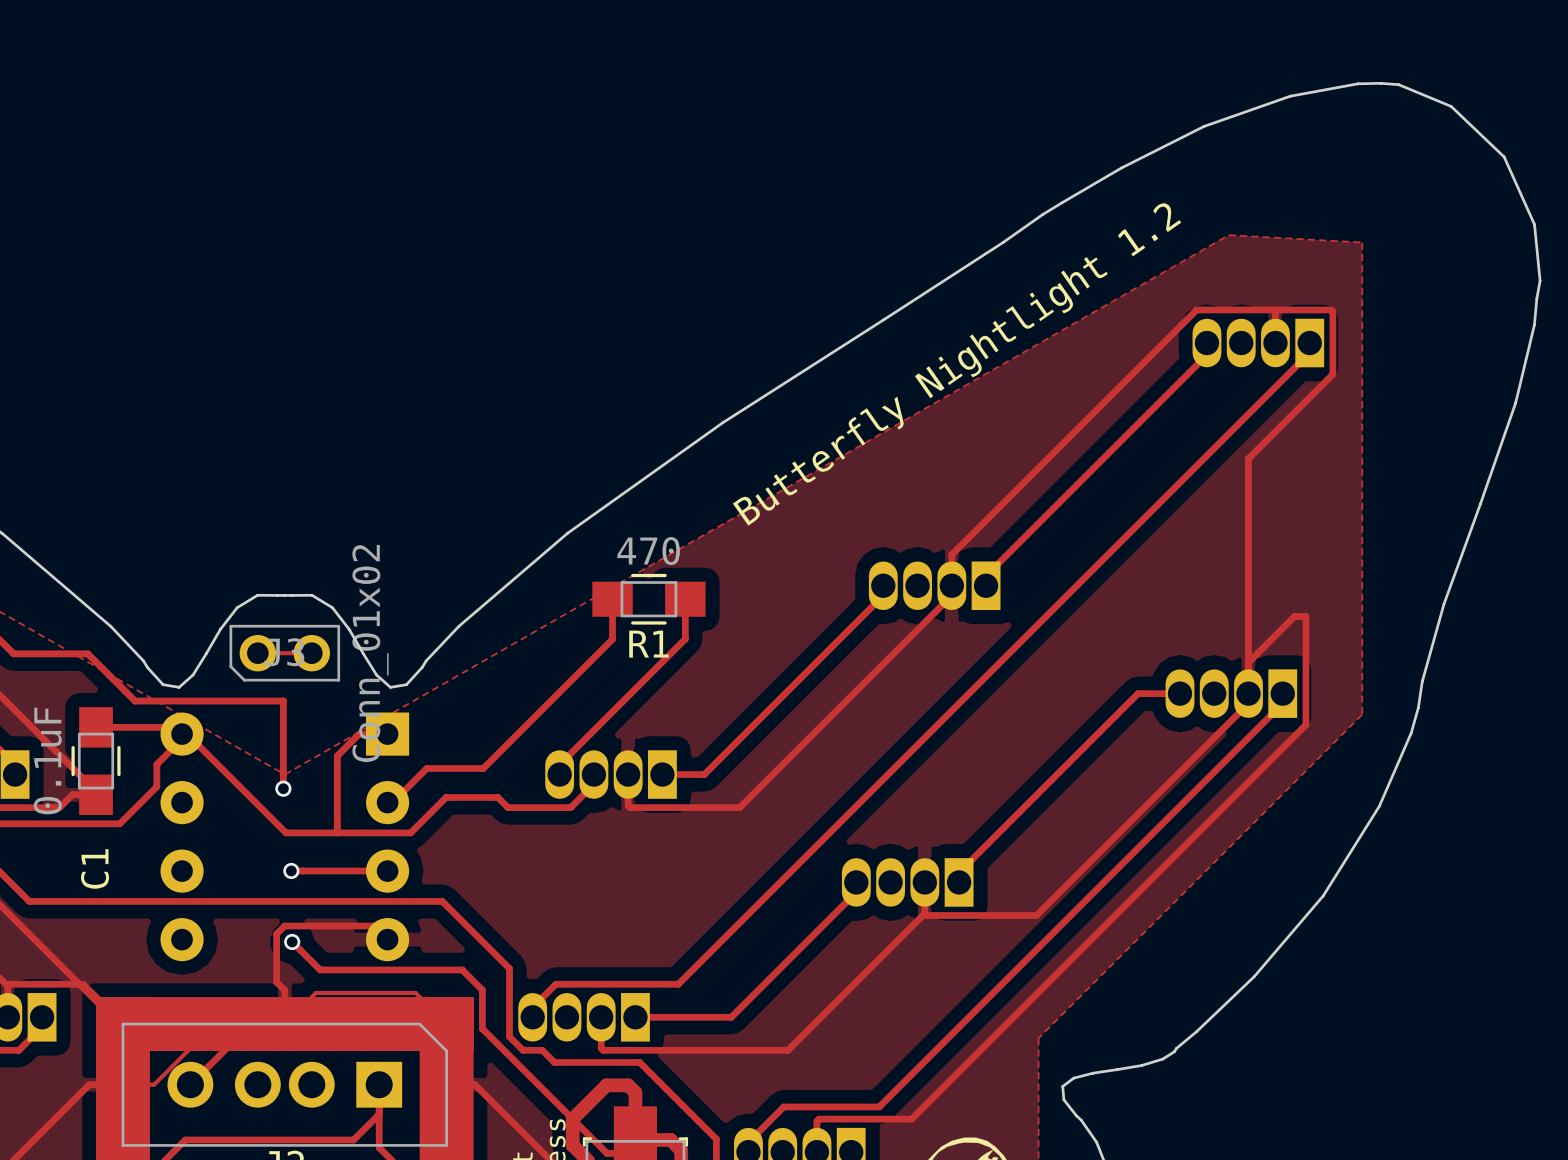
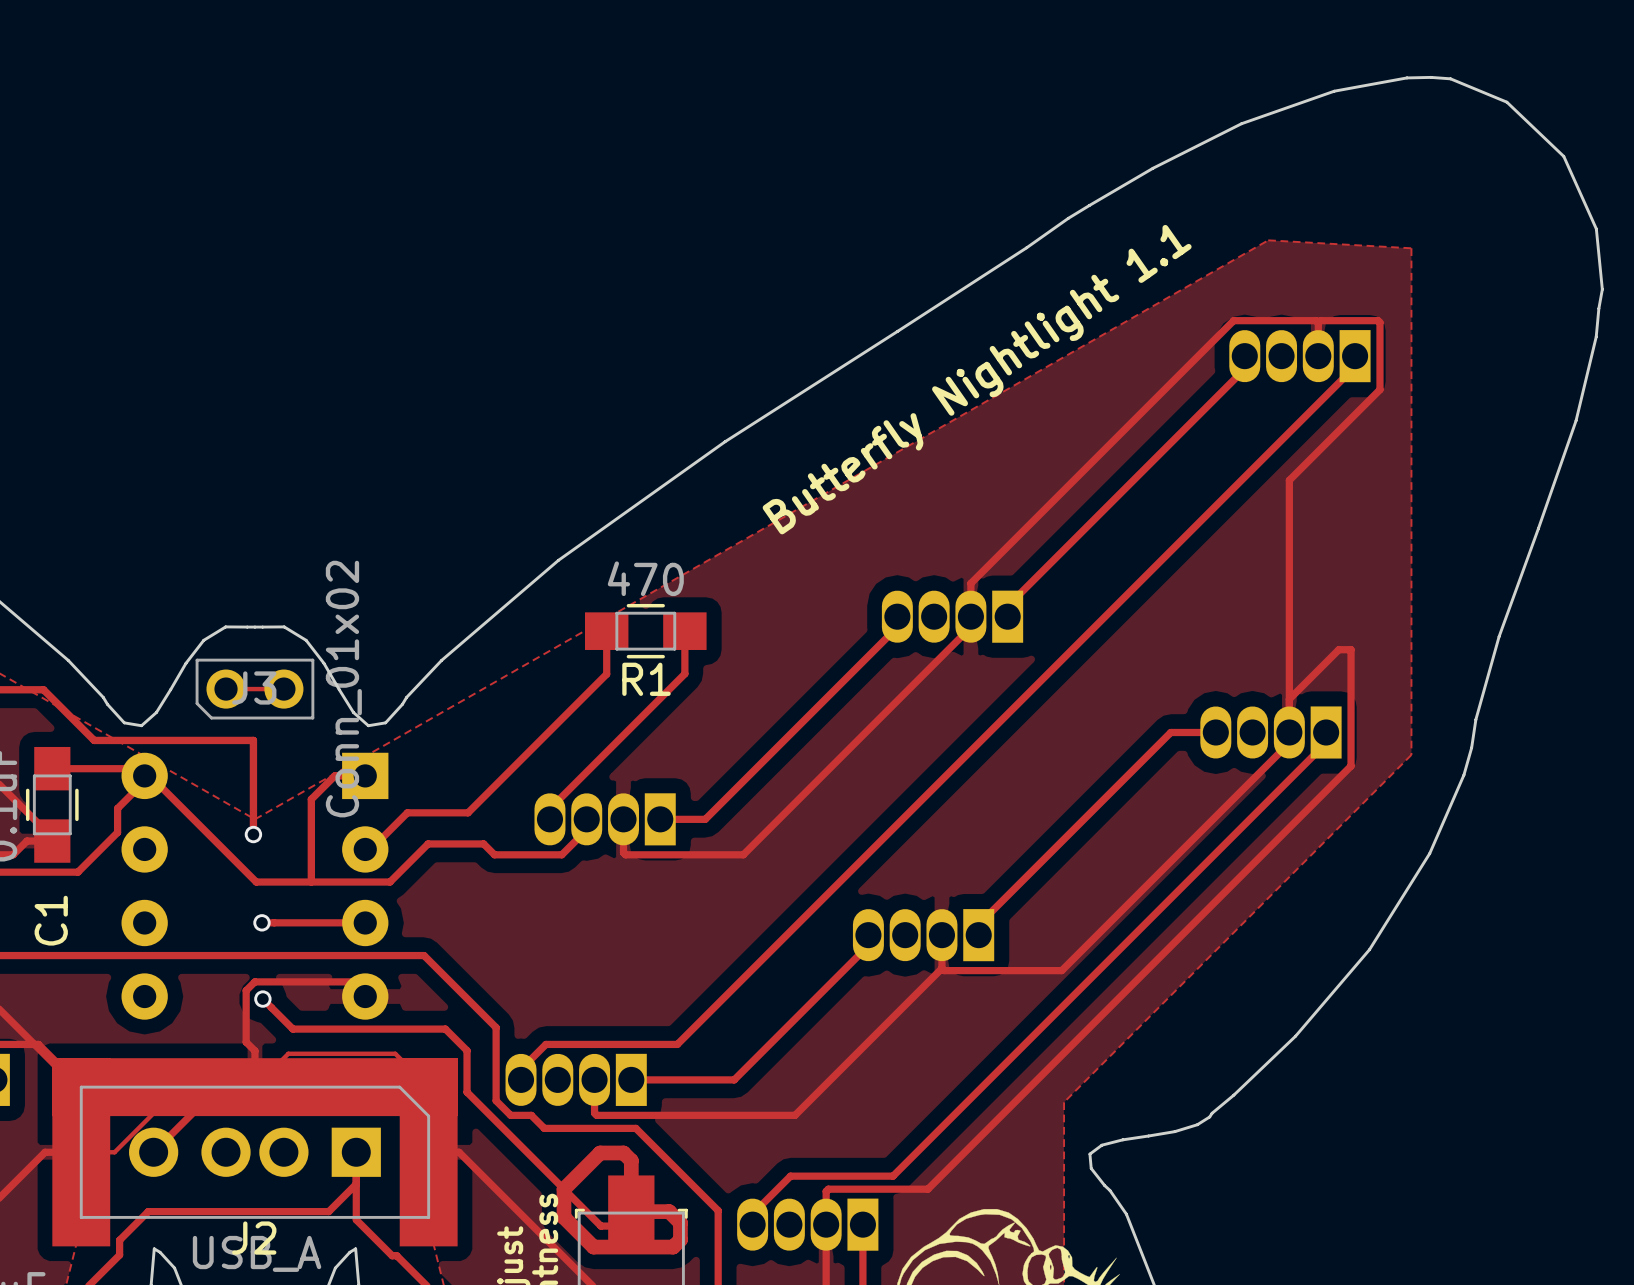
text: Butterfly Nightlight 1.2 (957, 364) -> Butterfly Nightlight 1.1 (977, 379)

